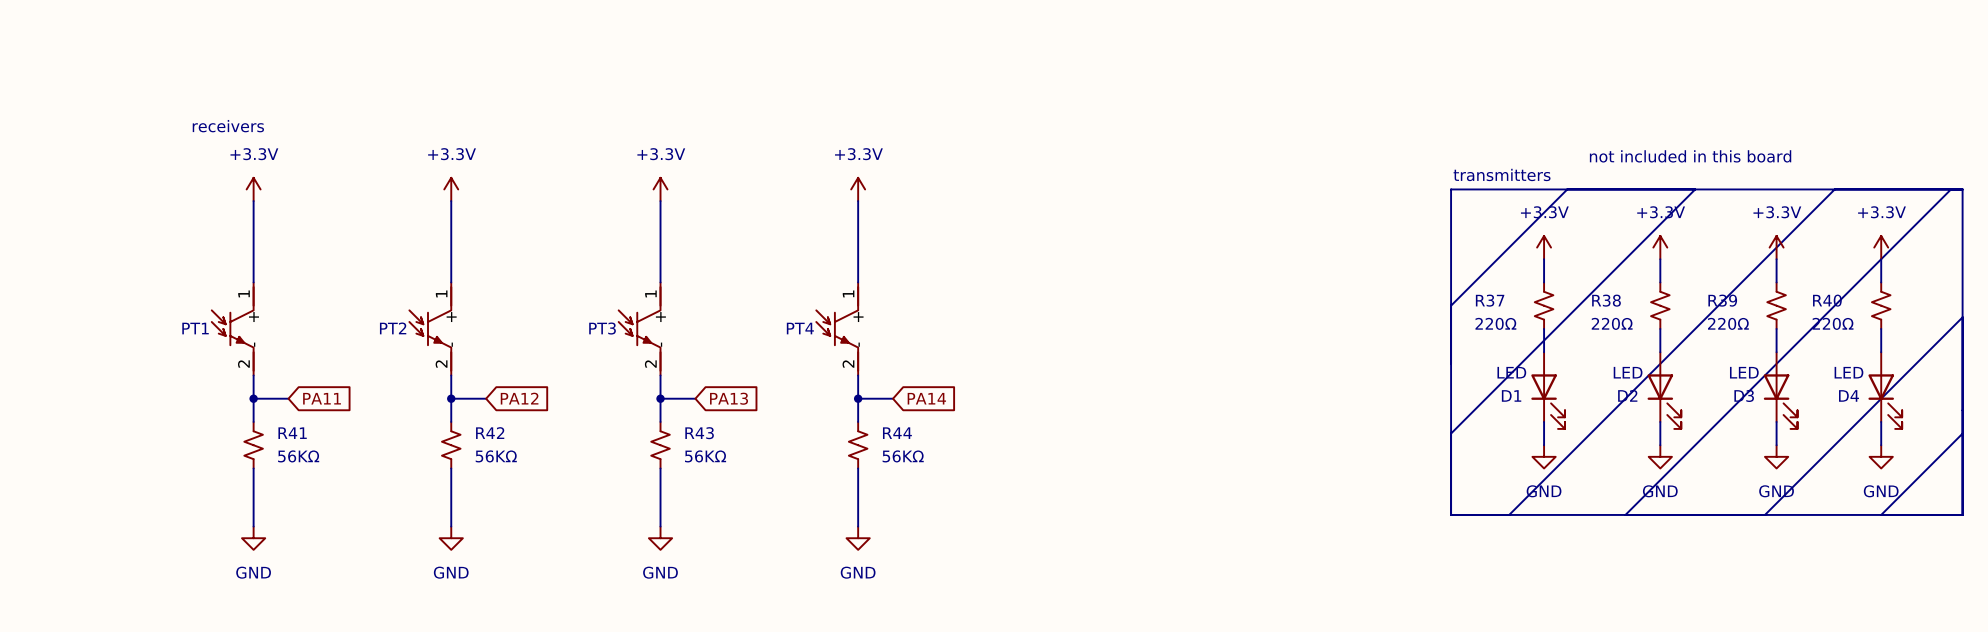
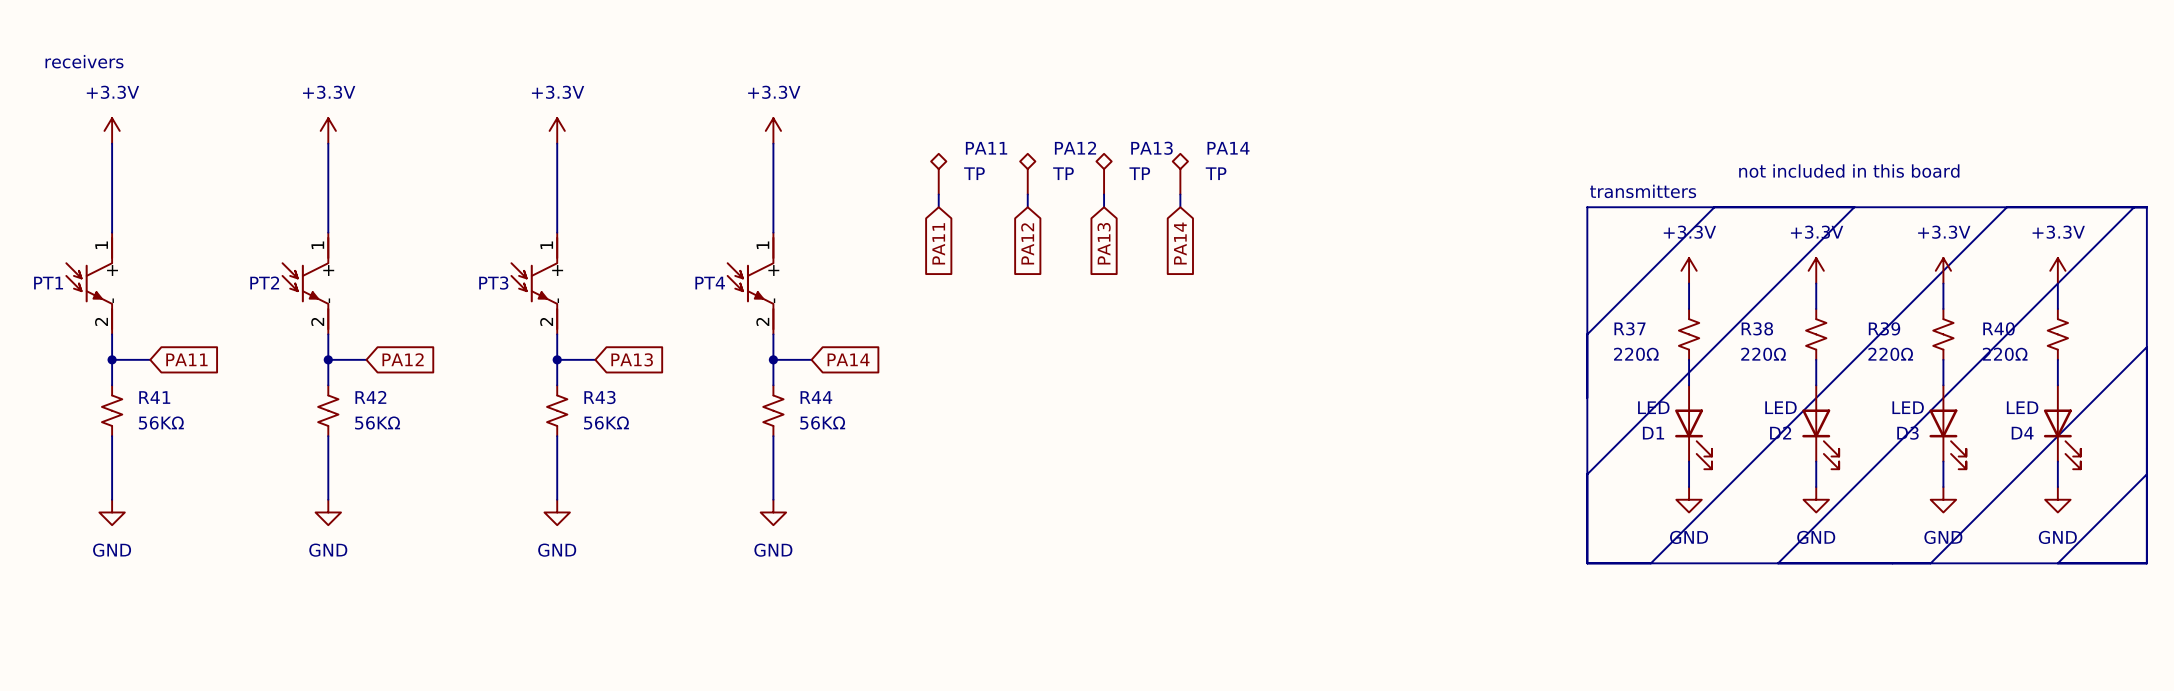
power symbol: none -> +3.3V (112, 130)
power symbol: none -> +3.3V (328, 130)
power symbol: none -> +3.3V (557, 130)
power symbol: none -> +3.3V (773, 130)
text position: receivers (228, 126) -> receivers (84, 61)
PA11: none -> TP (938, 174)
PA12: none -> TP (1027, 174)
PA13: none -> TP (1104, 174)
PA14: none -> TP (1180, 174)
wire: none -> (1027, 194) (1027, 207)
wire: none -> (1104, 194) (1104, 207)
wire: none -> (1180, 194) (1180, 207)
power symbol: +3.3V (253, 189) -> none
power symbol: +3.3V (451, 189) -> none
power symbol: +3.3V (660, 189) -> none
power symbol: +3.3V (858, 189) -> none
wire: (253, 201) (253, 282) -> (112, 143) (112, 232)
wire: (451, 201) (451, 282) -> (328, 143) (328, 232)
wire: (660, 201) (660, 282) -> (557, 143) (557, 232)
wire: (858, 201) (858, 282) -> (773, 143) (773, 232)
global label: none -> PA11 (938, 243)
global label: none -> PA12 (1027, 243)
global label: none -> PA13 (1104, 243)
global label: none -> PA14 (1180, 243)
junction: none -> (112, 359)
PT1 position: (232, 328) -> (89, 283)
junction: none -> (328, 359)
PT2 position: (430, 328) -> (305, 283)
junction: none -> (557, 359)
PT3 position: (639, 328) -> (534, 283)
junction: none -> (773, 359)
global label: none -> PA14 (848, 359)
PT4 position: (837, 328) -> (750, 283)
wire: (253, 375) (253, 421) -> (112, 334) (112, 385)
wire: (451, 375) (451, 421) -> (328, 334) (328, 385)
wire: (660, 375) (660, 421) -> (557, 334) (557, 385)
wire: (858, 375) (858, 421) -> (773, 334) (773, 385)
wire: (253, 398) (288, 398) -> (112, 359) (150, 359)
junction: (253, 398) -> none
global label position: PA11 (322, 398) -> PA11 (186, 359)
wire: (451, 398) (486, 398) -> (328, 359) (366, 359)
junction: (451, 398) -> none
global label position: PA12 (519, 398) -> PA12 (403, 359)
wire: (660, 398) (695, 398) -> (557, 359) (595, 359)
junction: (660, 398) -> none
global label position: PA13 (729, 398) -> PA13 (632, 359)
wire: (858, 398) (893, 398) -> (773, 359) (811, 359)
junction: (858, 398) -> none
global label: PA14 (926, 398) -> none
R41 position: (253, 445) -> (112, 410)
R42 position: (451, 445) -> (328, 410)
R43 position: (660, 445) -> (557, 410)
R44 position: (858, 445) -> (773, 410)
power symbol: none -> GND (112, 512)
wire: (253, 468) (253, 526) -> (112, 436) (112, 499)
power symbol: none -> GND (328, 512)
wire: (451, 468) (451, 526) -> (328, 436) (328, 499)
power symbol: none -> GND (557, 512)
wire: (660, 468) (660, 526) -> (557, 436) (557, 499)
power symbol: none -> GND (773, 512)
wire: (858, 468) (858, 526) -> (773, 436) (773, 499)
power symbol: GND (253, 538) -> none
power symbol: GND (451, 538) -> none
power symbol: GND (660, 538) -> none
power symbol: GND (858, 538) -> none

